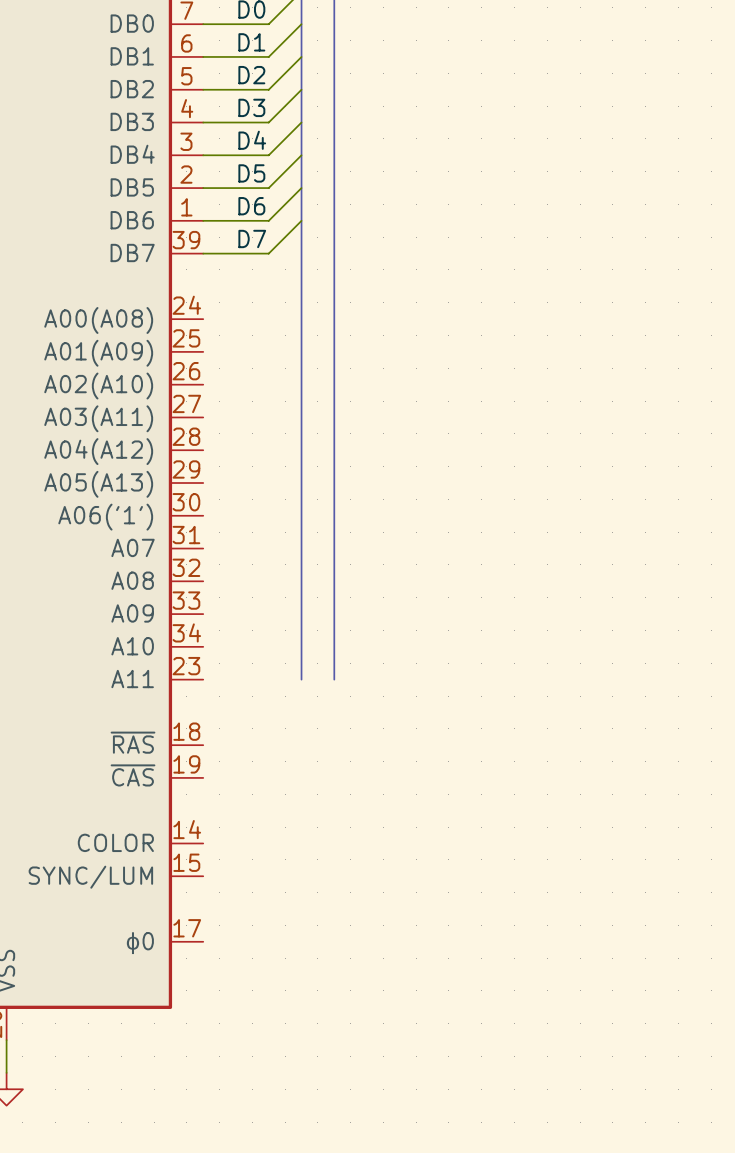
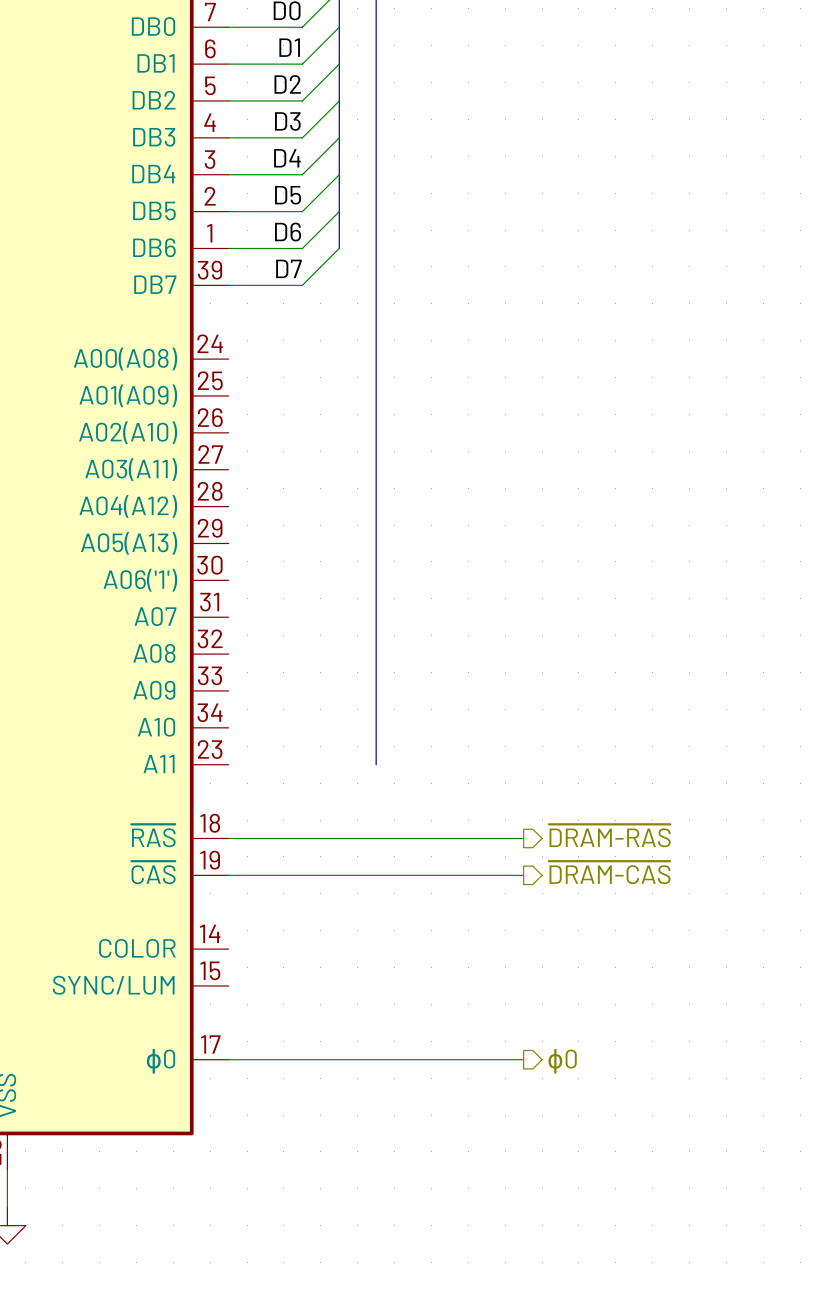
bus: (301, 220) (301, 679) -> none
hierarchical label: none -> ~{DRAM-RAS} (609, 835)
wire: none -> (228, 838) (523, 838)
hierarchical label: none -> ~{DRAM-CAS} (609, 872)
wire: none -> (228, 875) (523, 875)
wire: none -> (228, 1059) (523, 1059)
hierarchical label: none -> ϕ0 (562, 1061)

